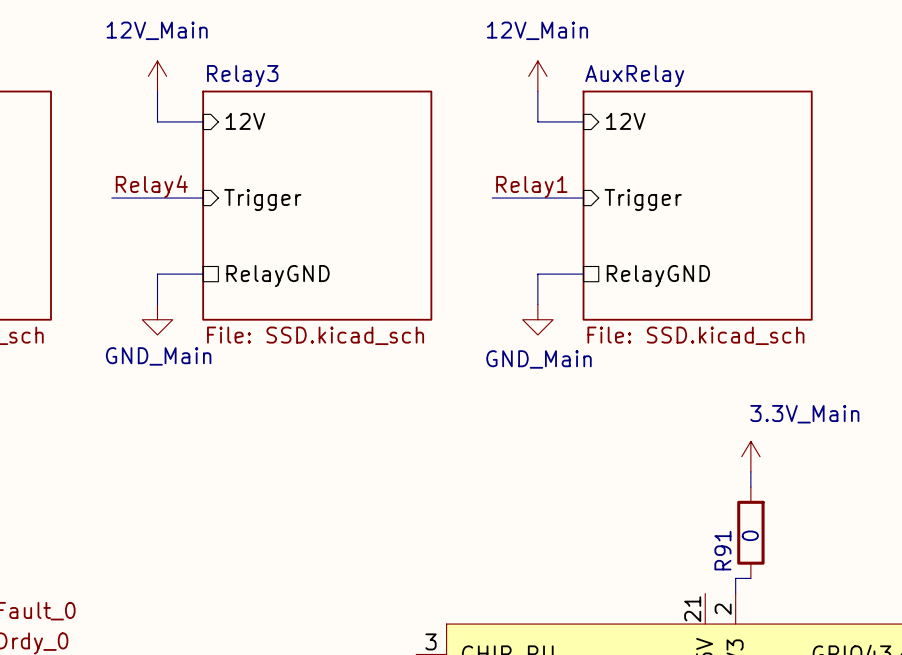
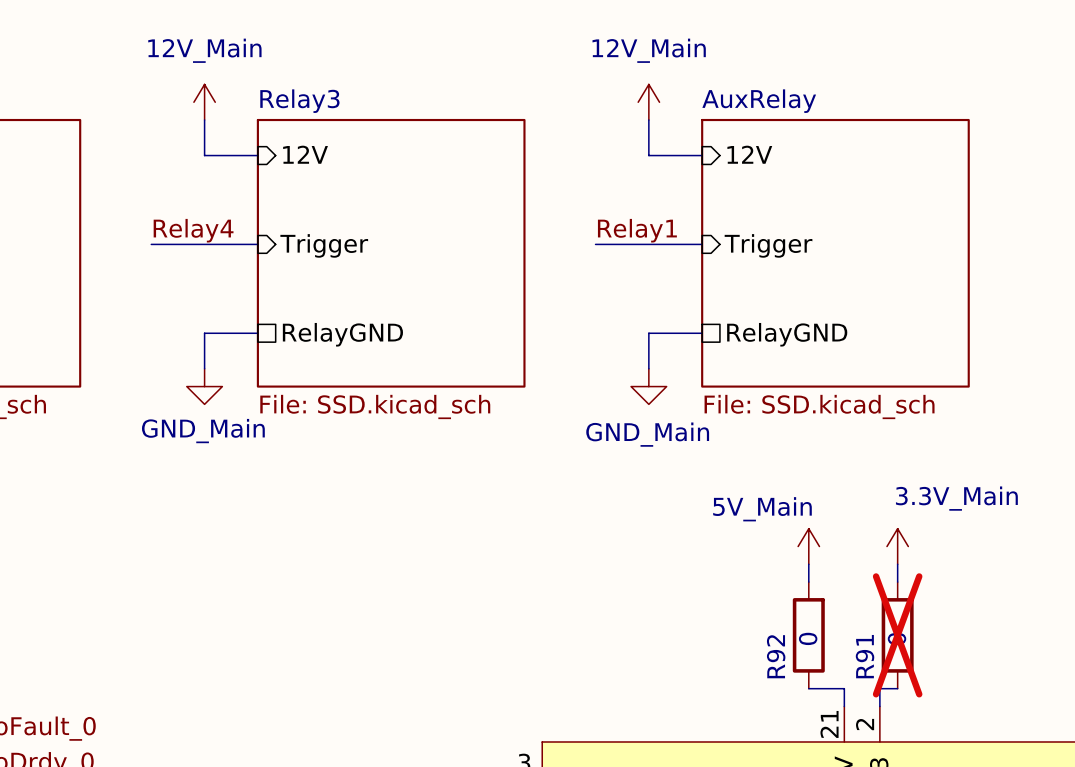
power symbol: none -> 5V_Main (808, 546)
wire: none -> (808, 564) (808, 582)
R92: none -> 0 (808, 635)
R91 do-not-place cross: none -> (897, 635)
wire: none -> (808, 688) (844, 688) (844, 706)

